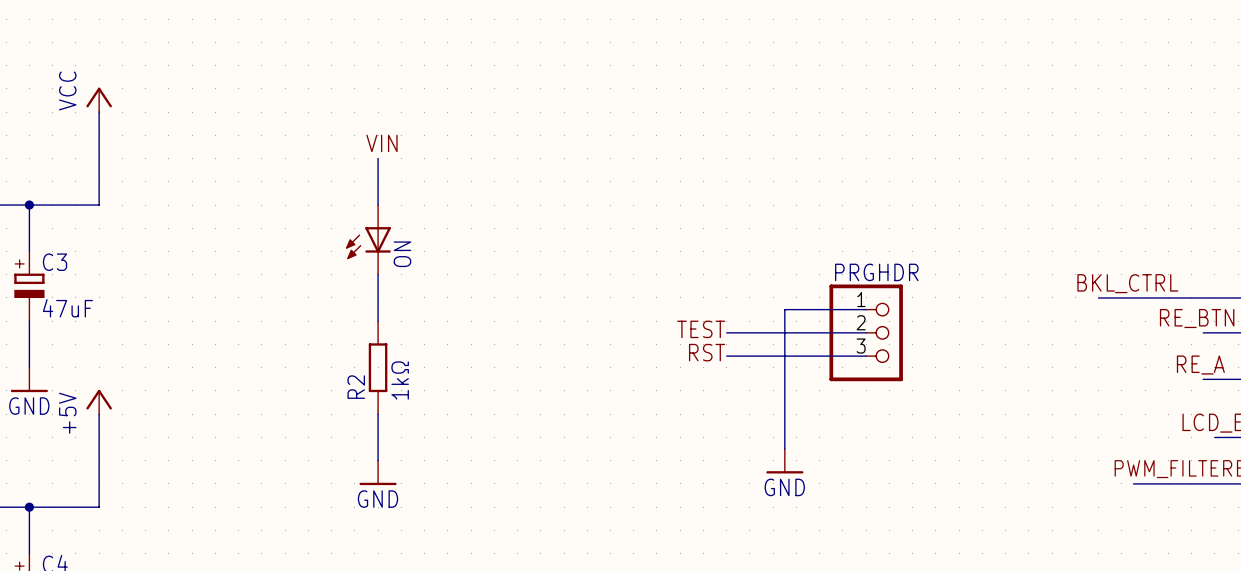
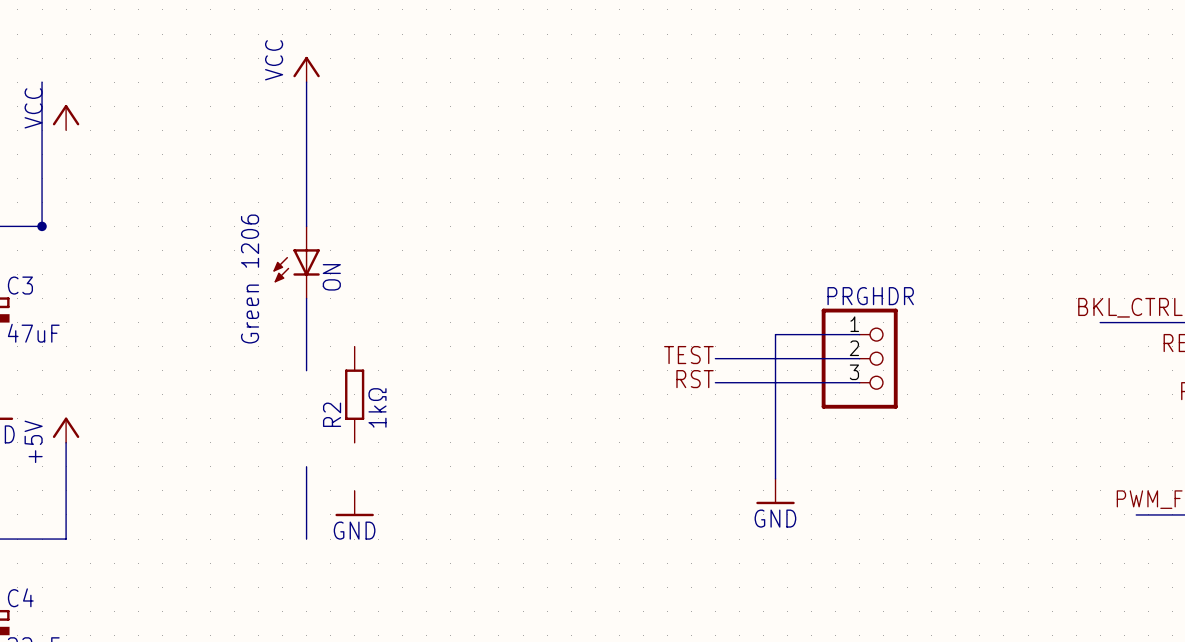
power symbol: none -> VCC (306, 69)
wire: none -> (306, 82) (306, 226)
wire: (99, 112) (99, 205) (75, 205) -> (42, 82) (42, 226)
label: VIN (381, 143) -> none
wire: (378, 158) (378, 205) -> none
junction: none -> (42, 226)
ON position: (368, 239) -> (296, 262)
text: none -> Green 1206 (250, 279)
wire: none -> (306, 298) (306, 370)
wire: (378, 274) (378, 321) -> none
wire: (378, 414) (378, 460) -> none
wire: none -> (306, 466) (306, 539)

